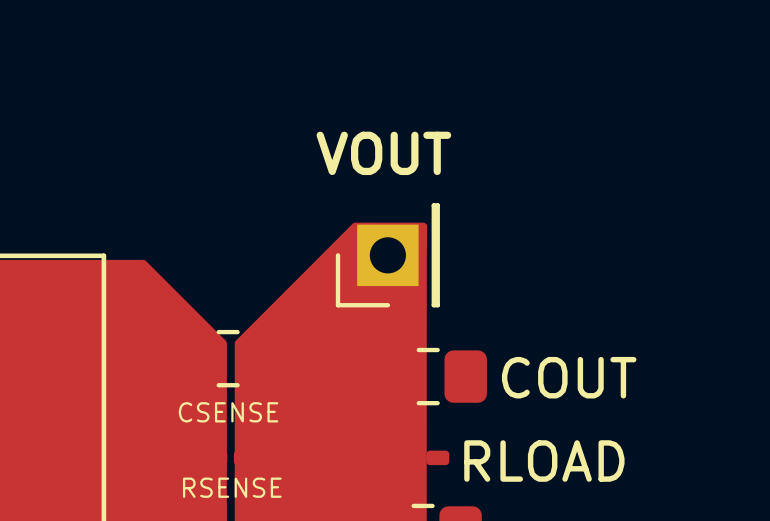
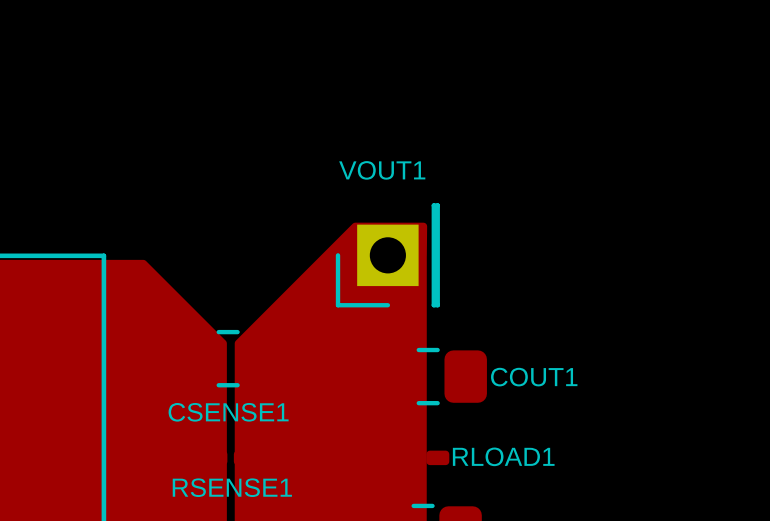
VOUT name: VOUT (383, 153) -> VOUT1 (382, 170)
COUT name: COUT (569, 377) -> COUT1 (534, 377)
CSENSE name: CSENSE (228, 412) -> CSENSE1 (228, 412)
RLOAD name: RLOAD (544, 461) -> RLOAD1 (503, 456)
RSENSE name: RSENSE (232, 487) -> RSENSE1 (232, 487)

